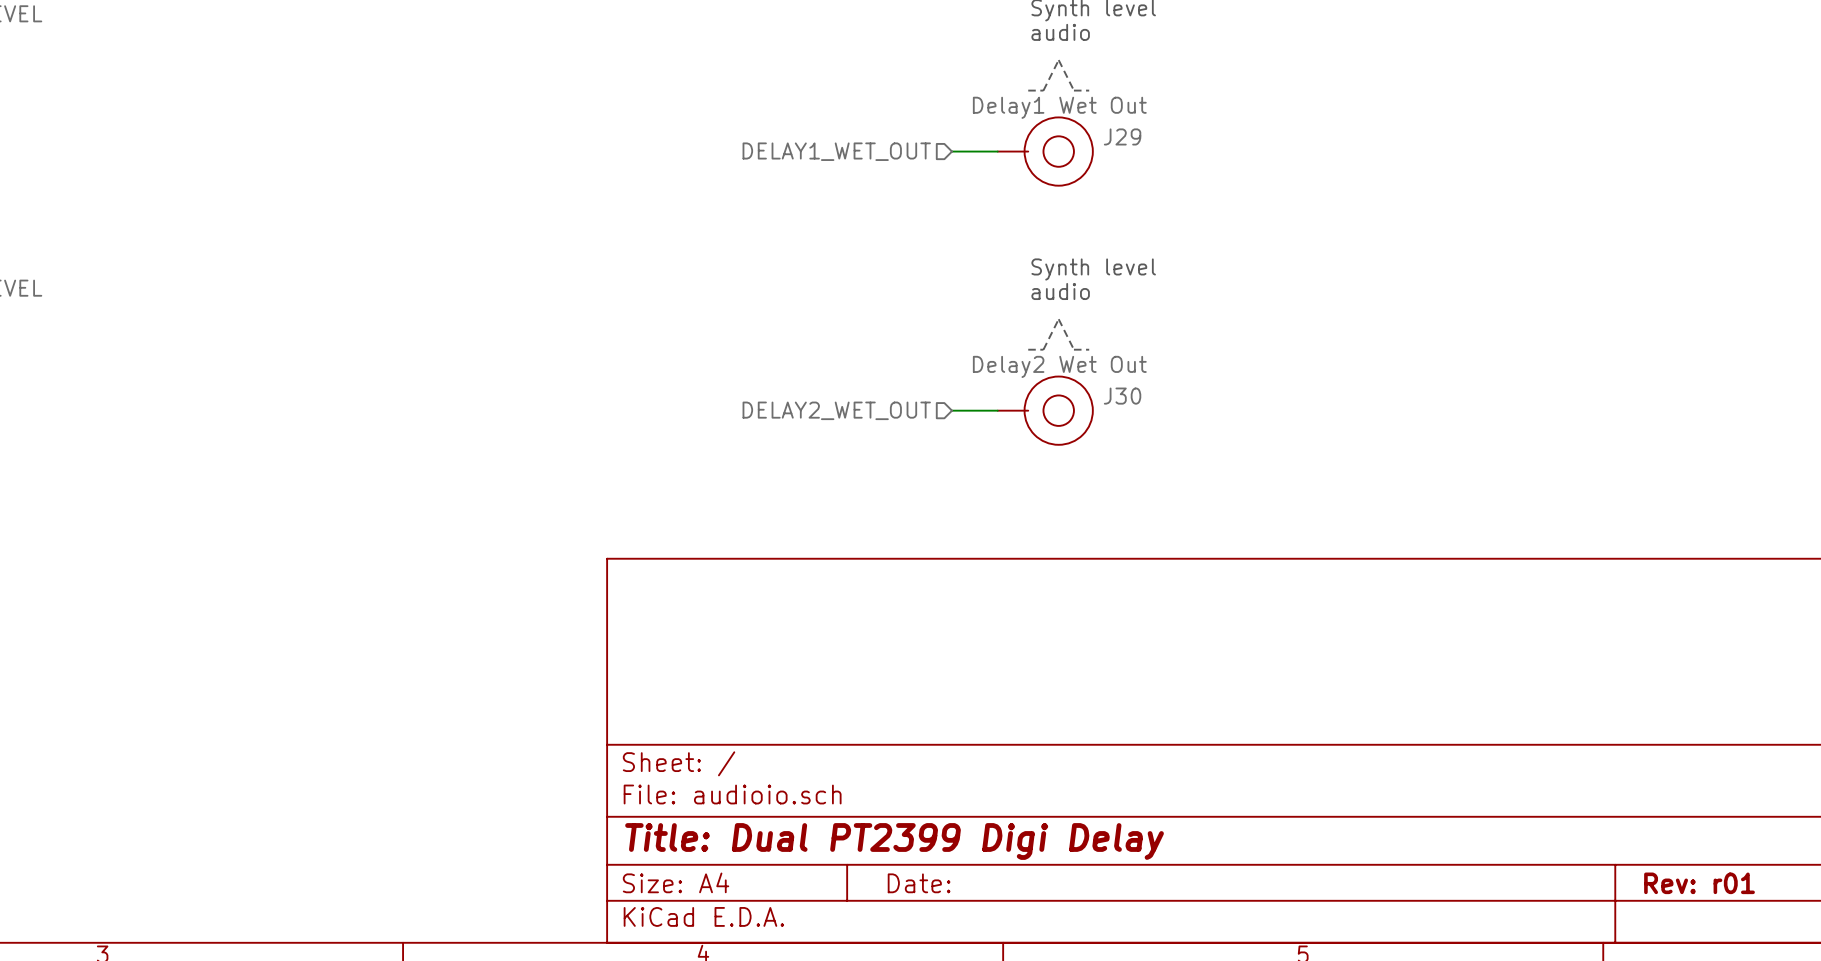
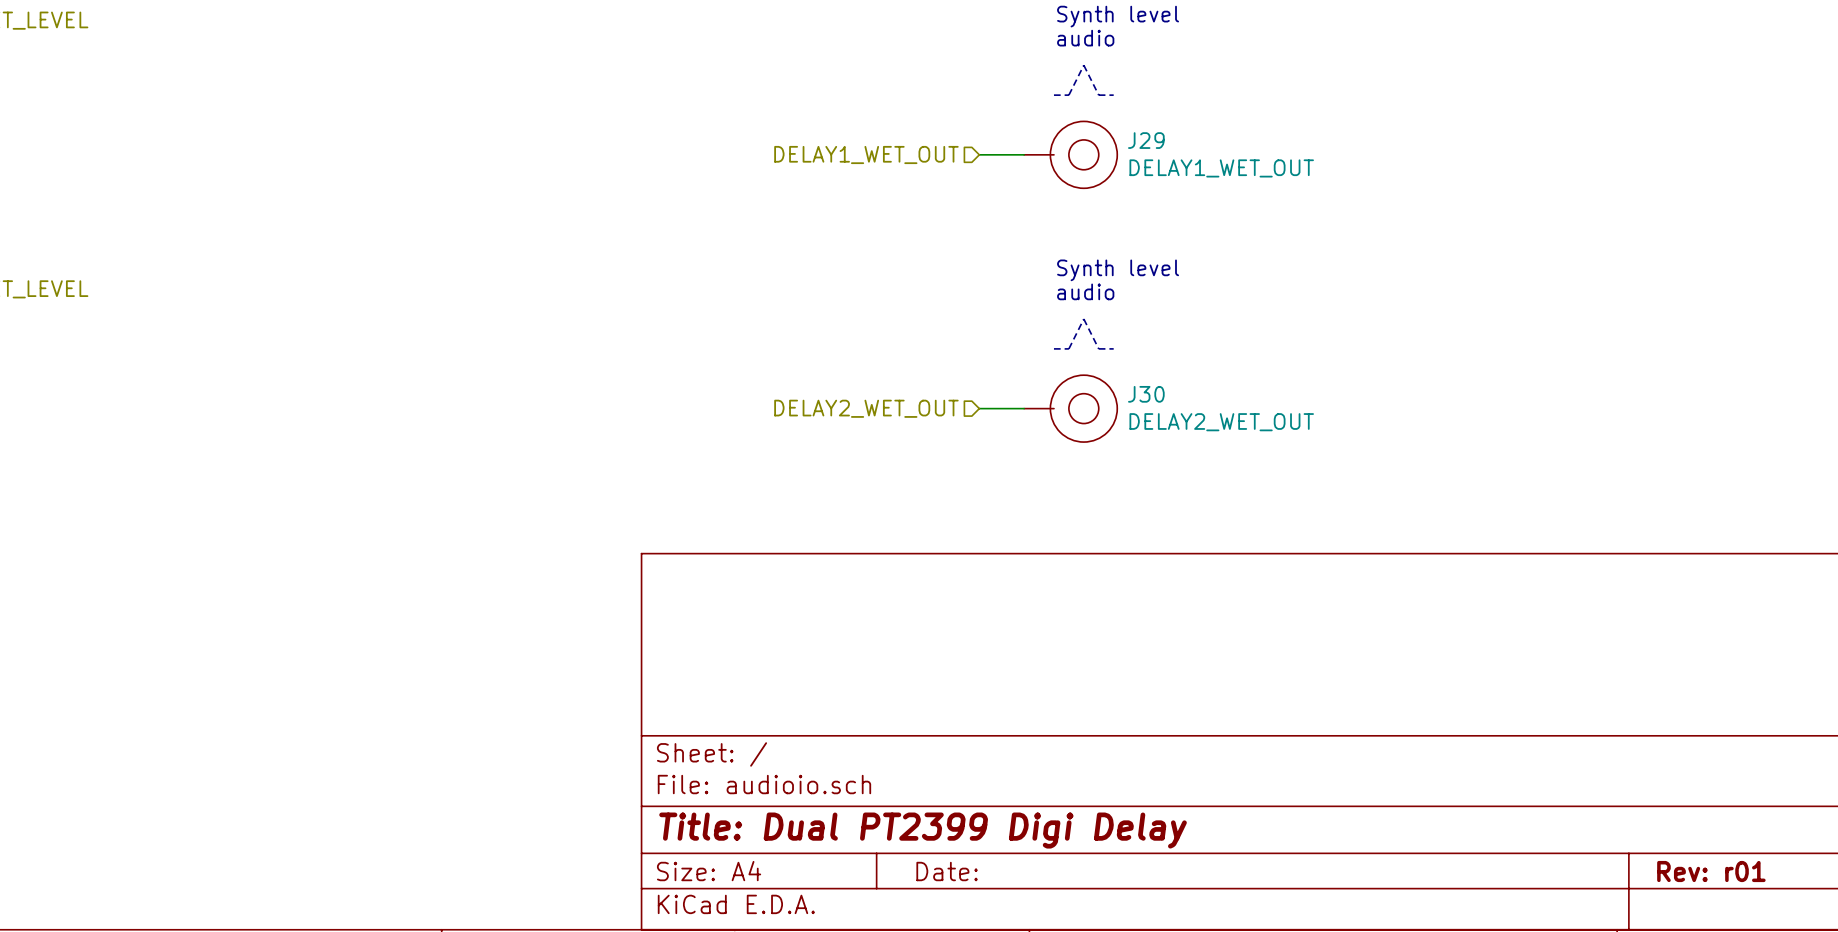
J29 text: Delay1 Wet Out (1059, 107) -> none
J29 value: none -> DELAY1_WET_OUT (1221, 168)
J30 text: Delay2 Wet Out (1059, 366) -> none
J30 value: none -> DELAY2_WET_OUT (1221, 422)

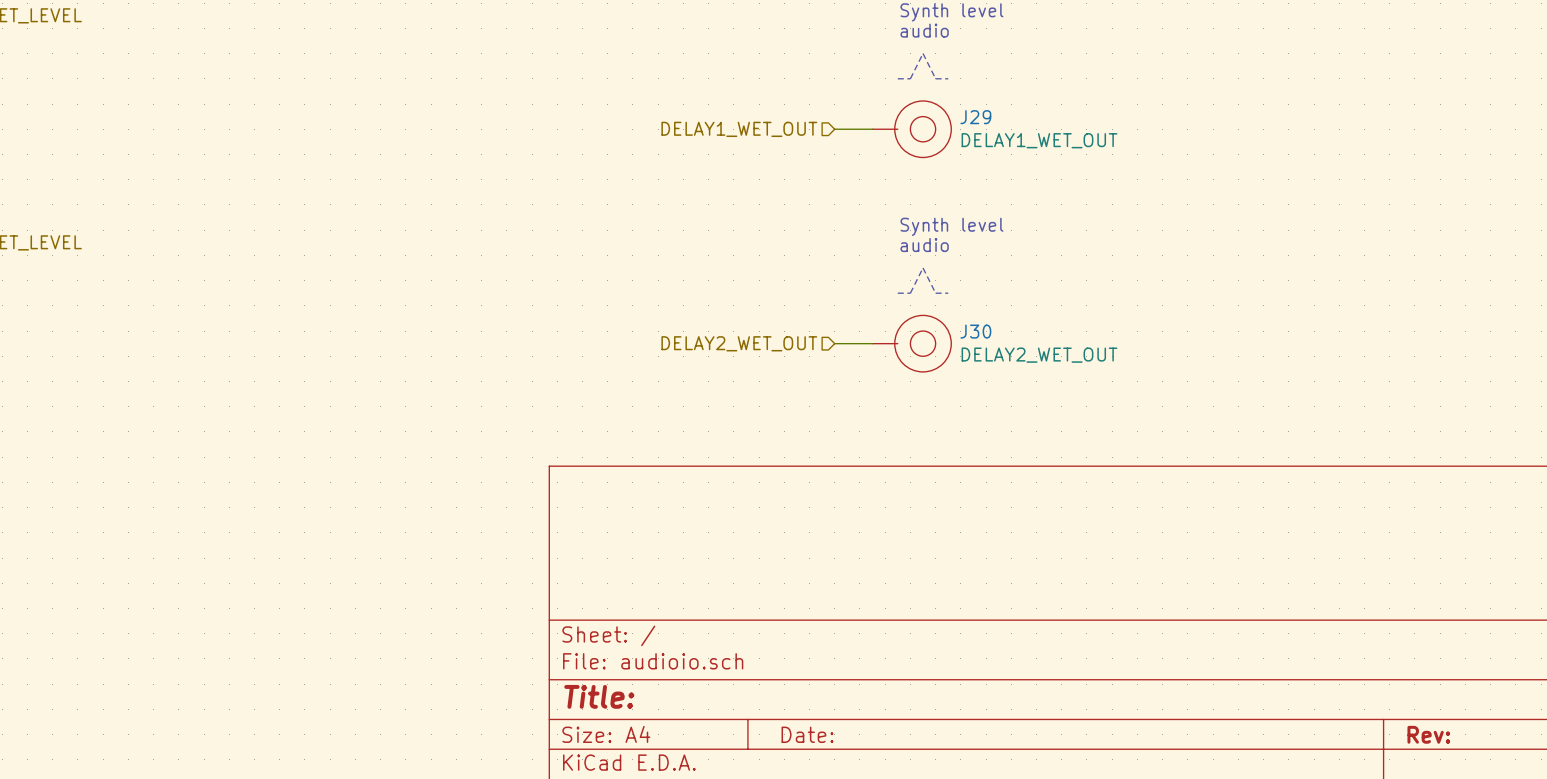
title block: Title: Dual PT2399 Digi Delay (923, 830) -> Title: (599, 696)
title block: Rev: r01 (1711, 871) -> Rev: (1428, 734)

